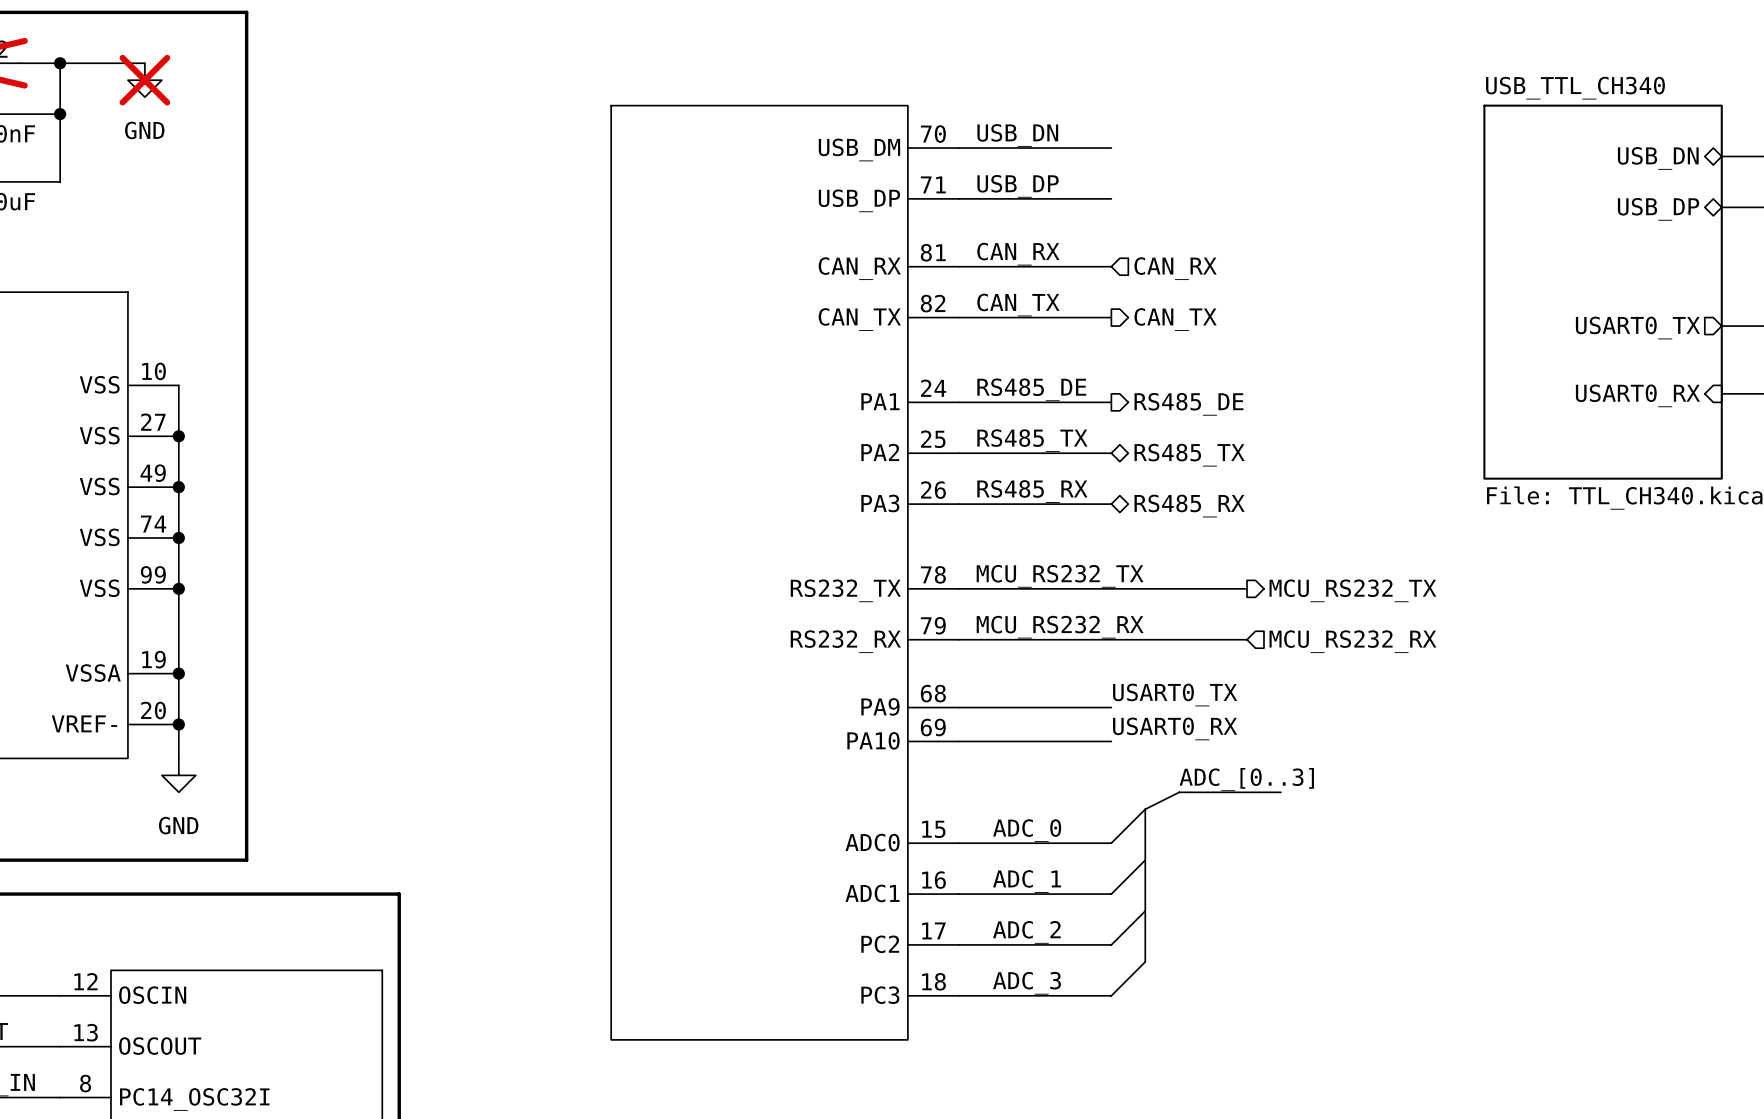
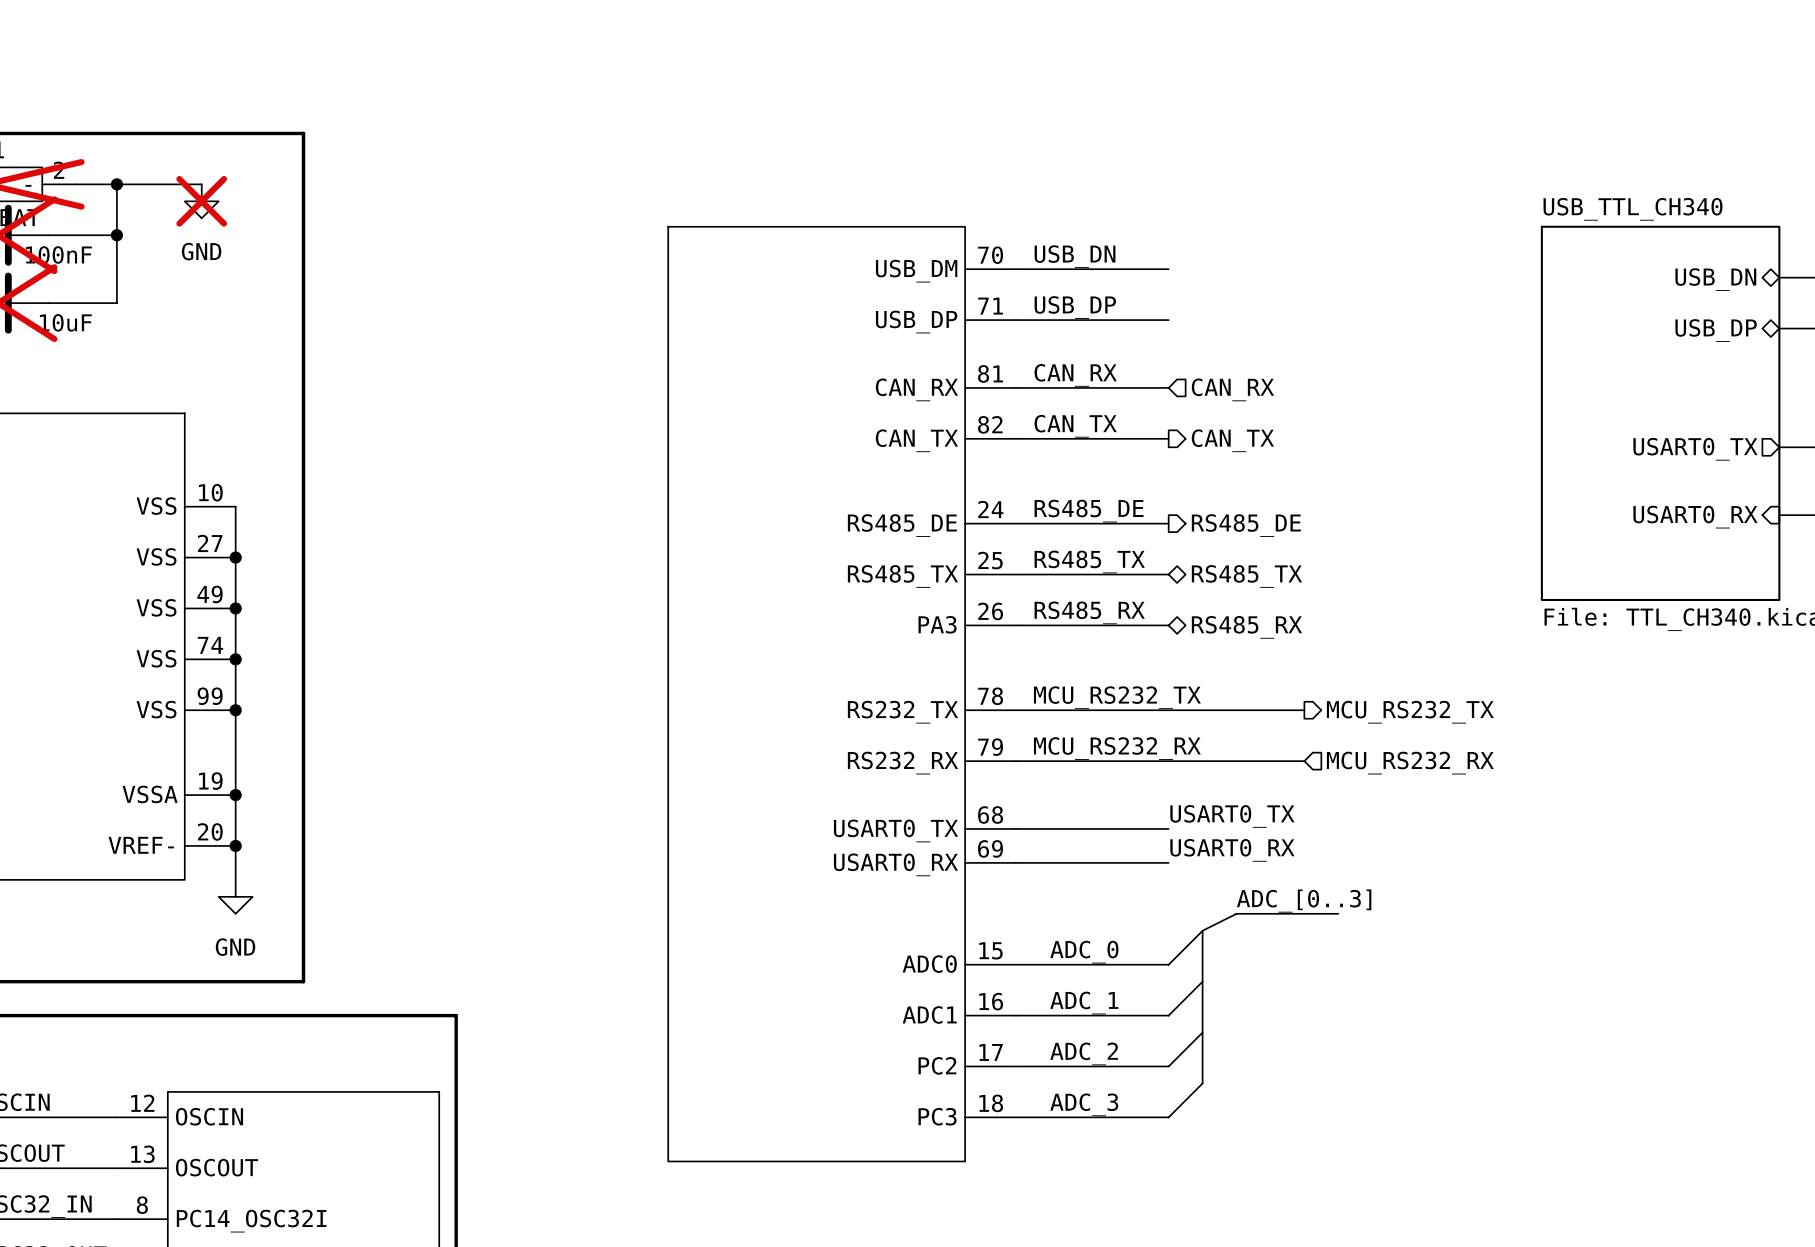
part pin name: PA1 (880, 401) -> RS485_DE (902, 525)
part pin name: PA2 (880, 452) -> RS485_TX (902, 576)
part pin name: PA9 (880, 706) -> USART0_TX (896, 830)
part pin name: PA10 (873, 740) -> USART0_RX (896, 864)

